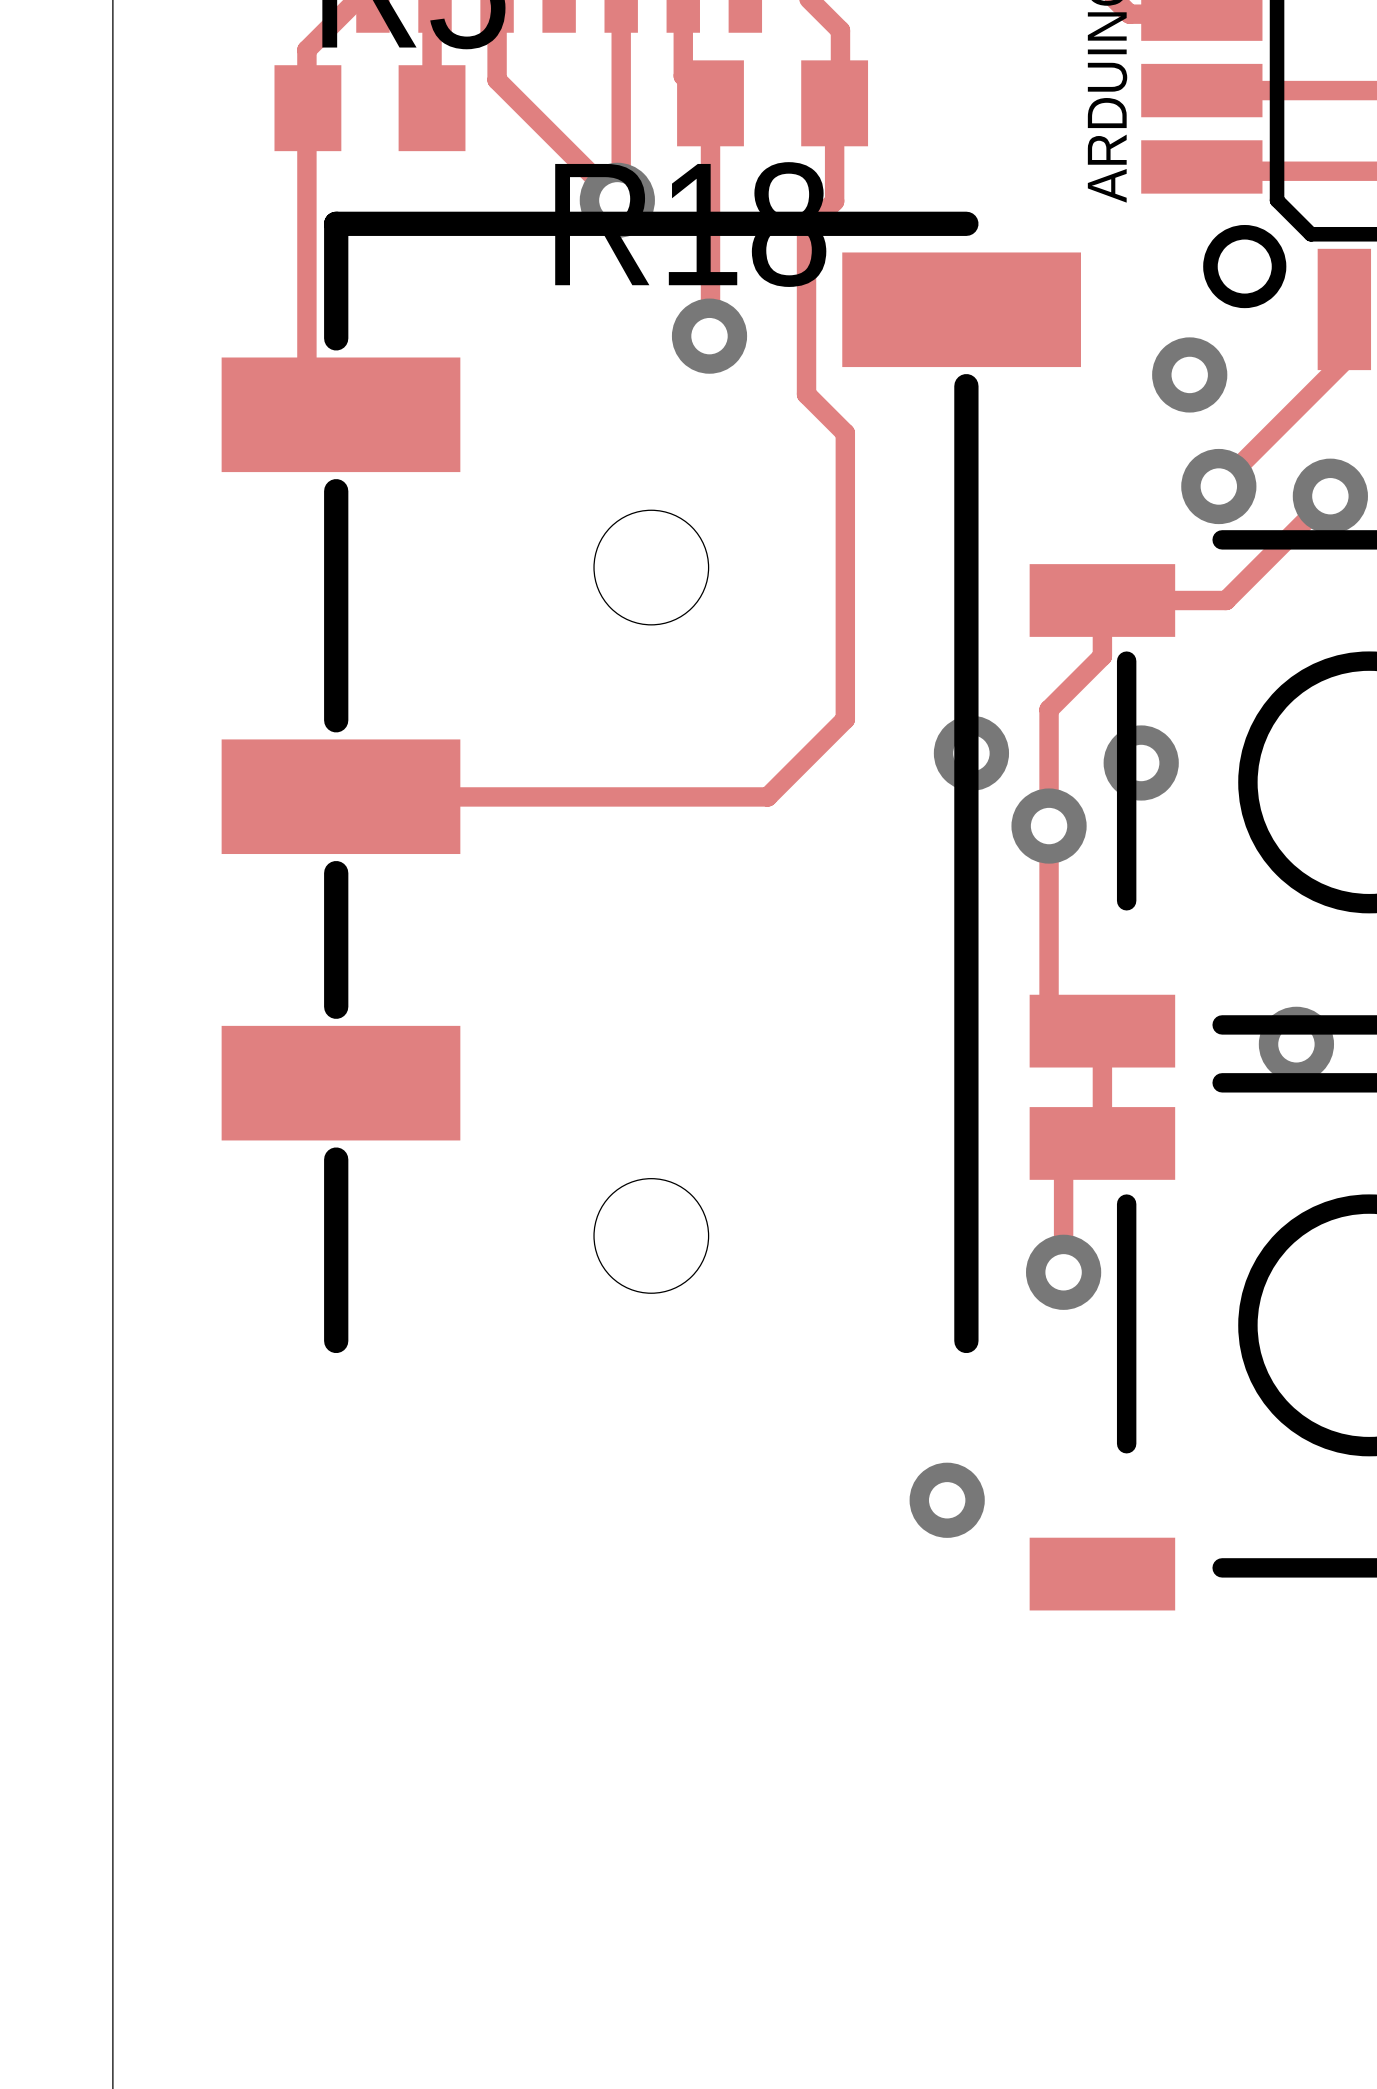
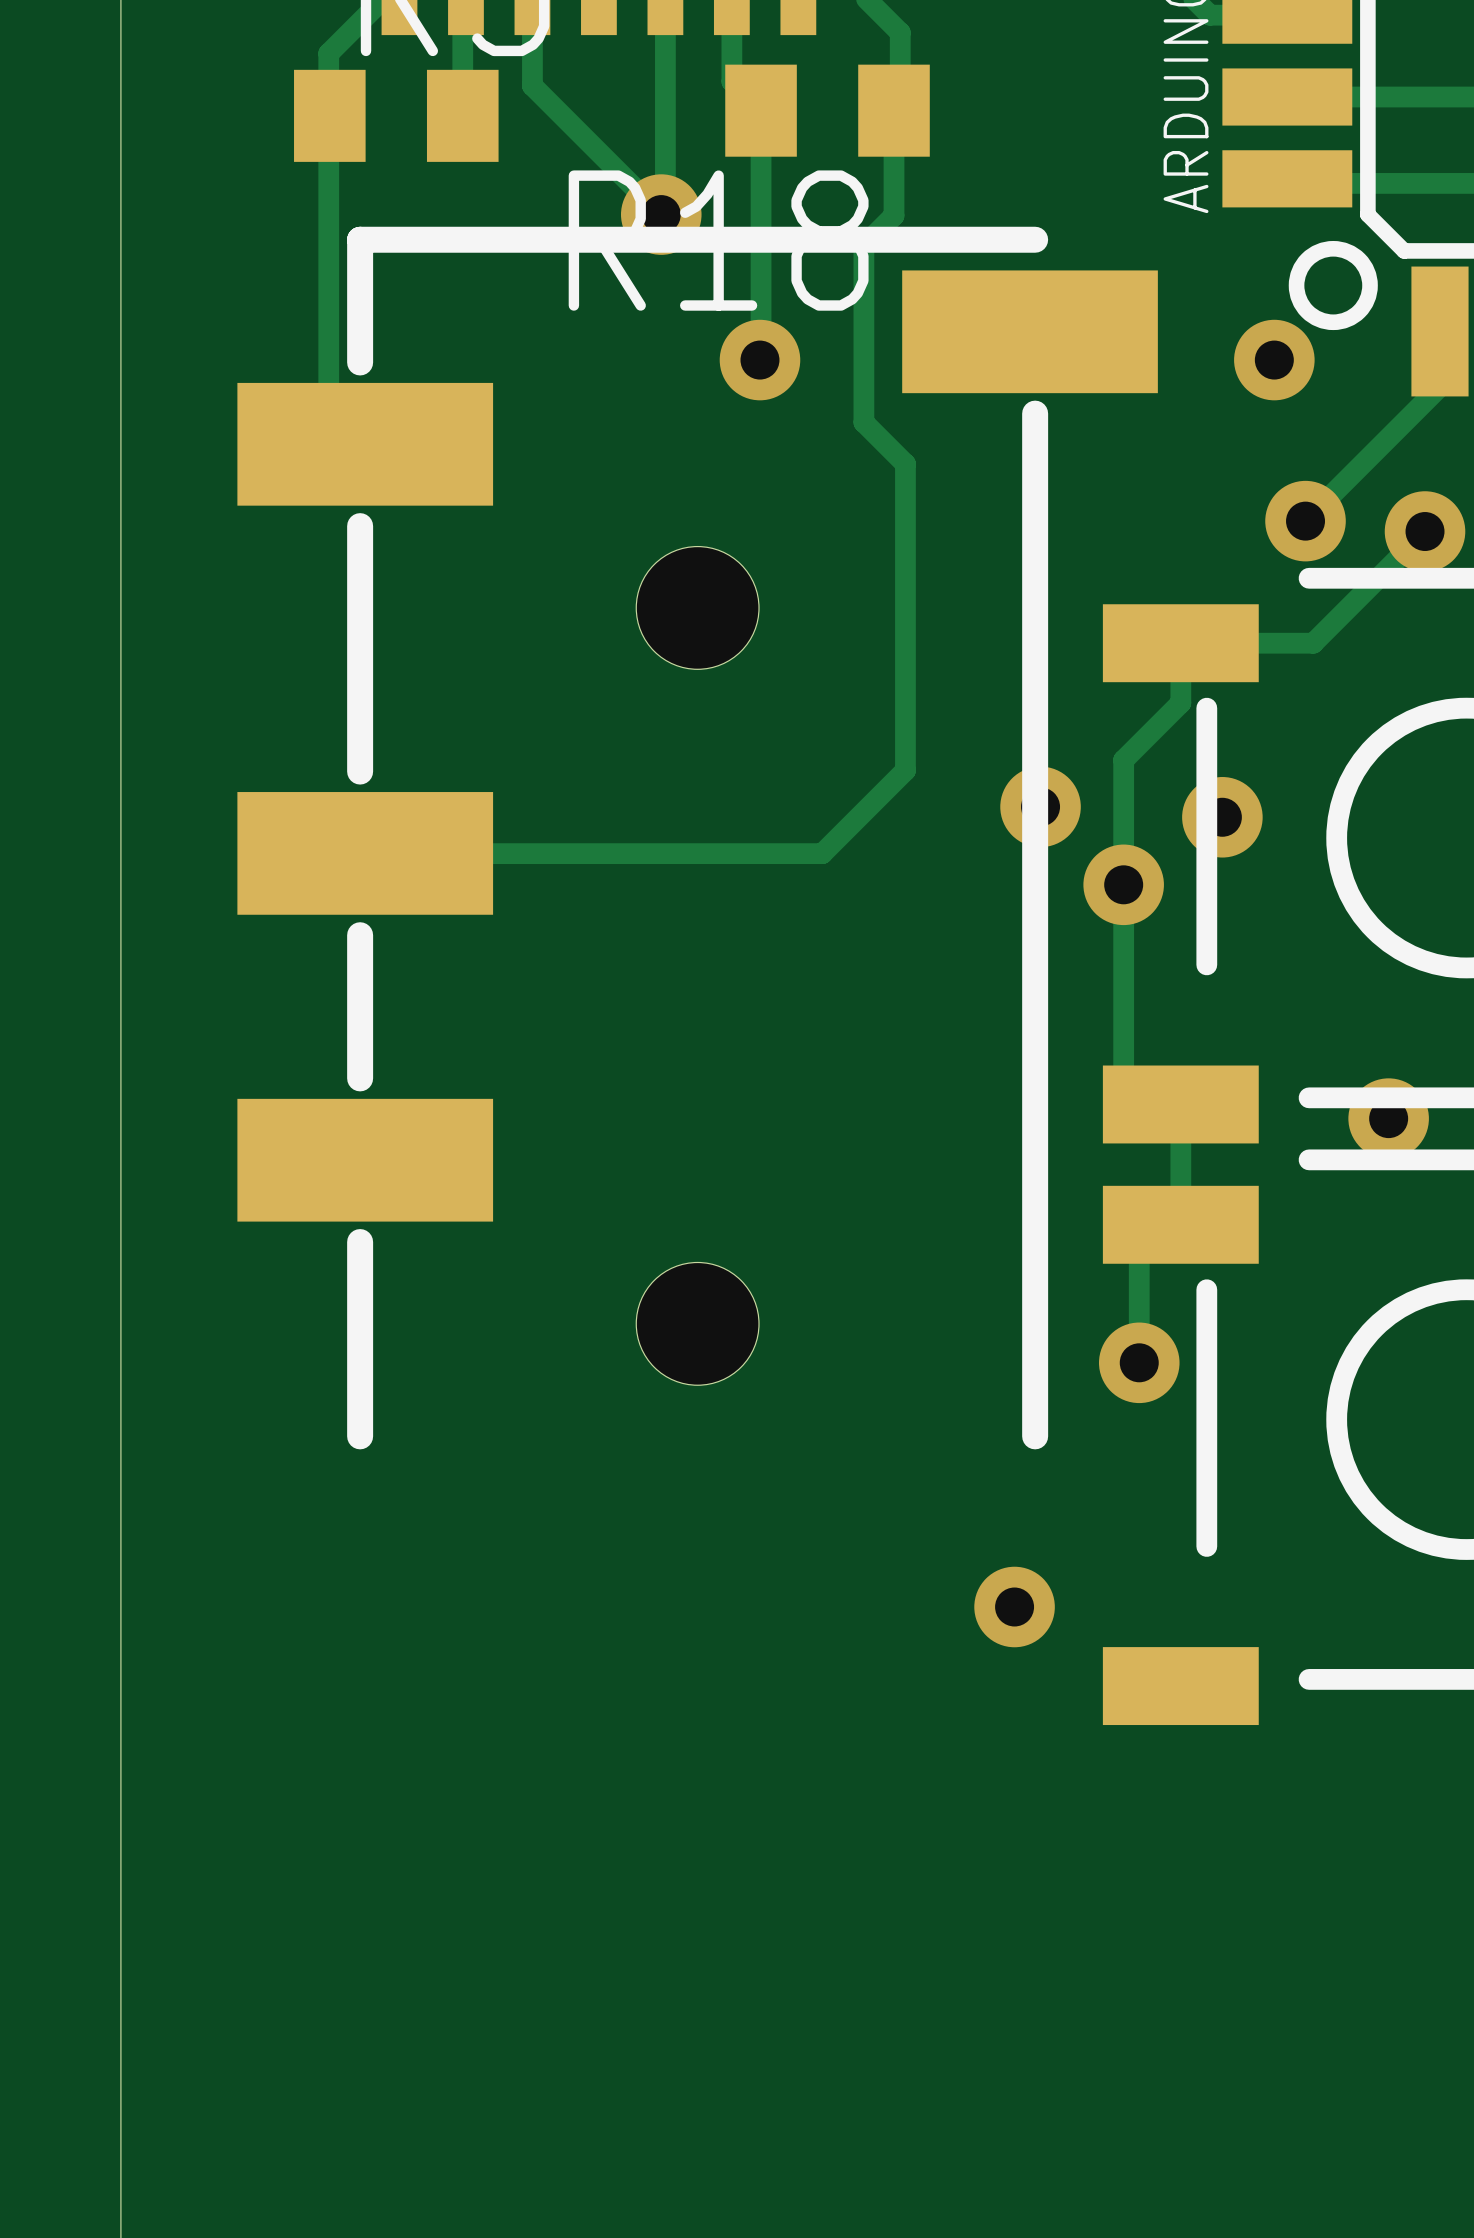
via position: (1189, 374) -> (1274, 360)

